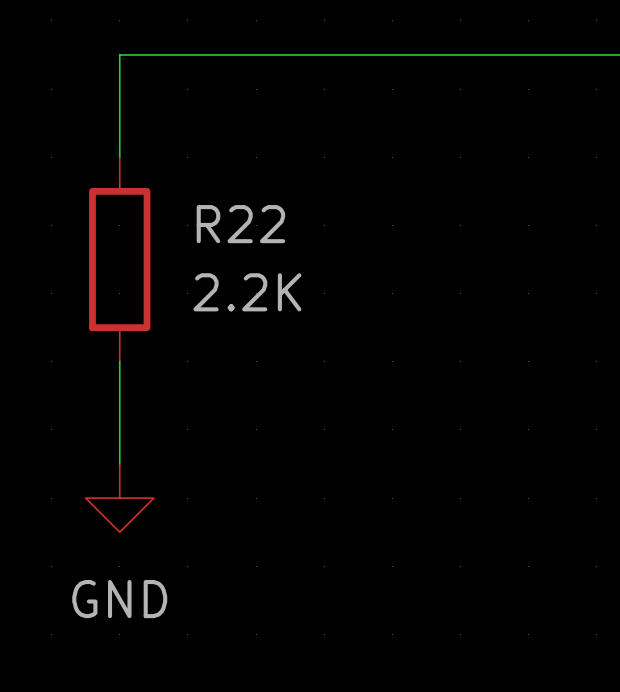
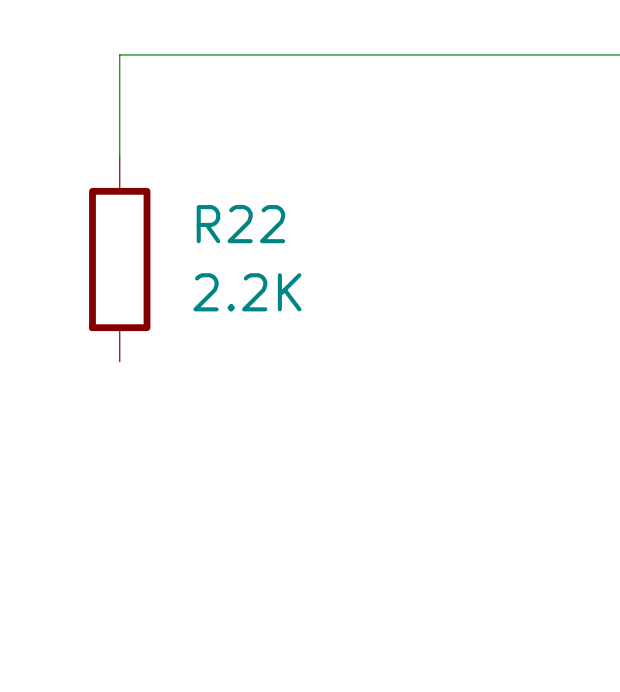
wire: (119, 361) (119, 464) -> none
power symbol: GND (119, 498) -> none

